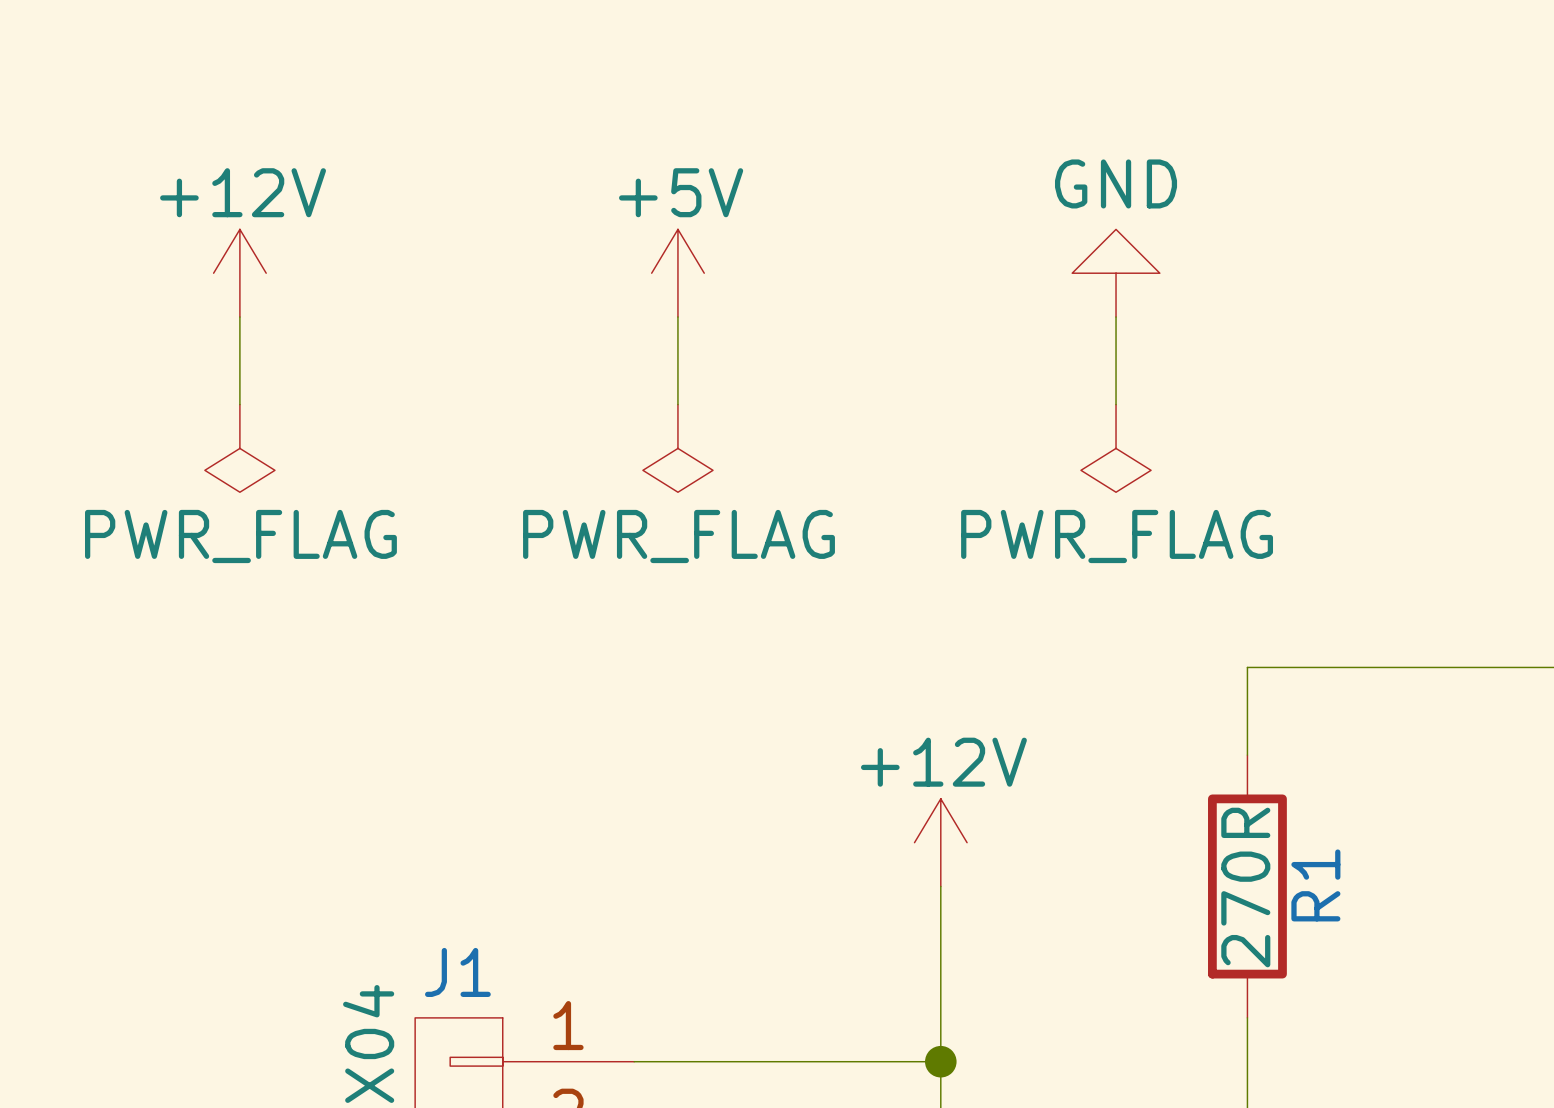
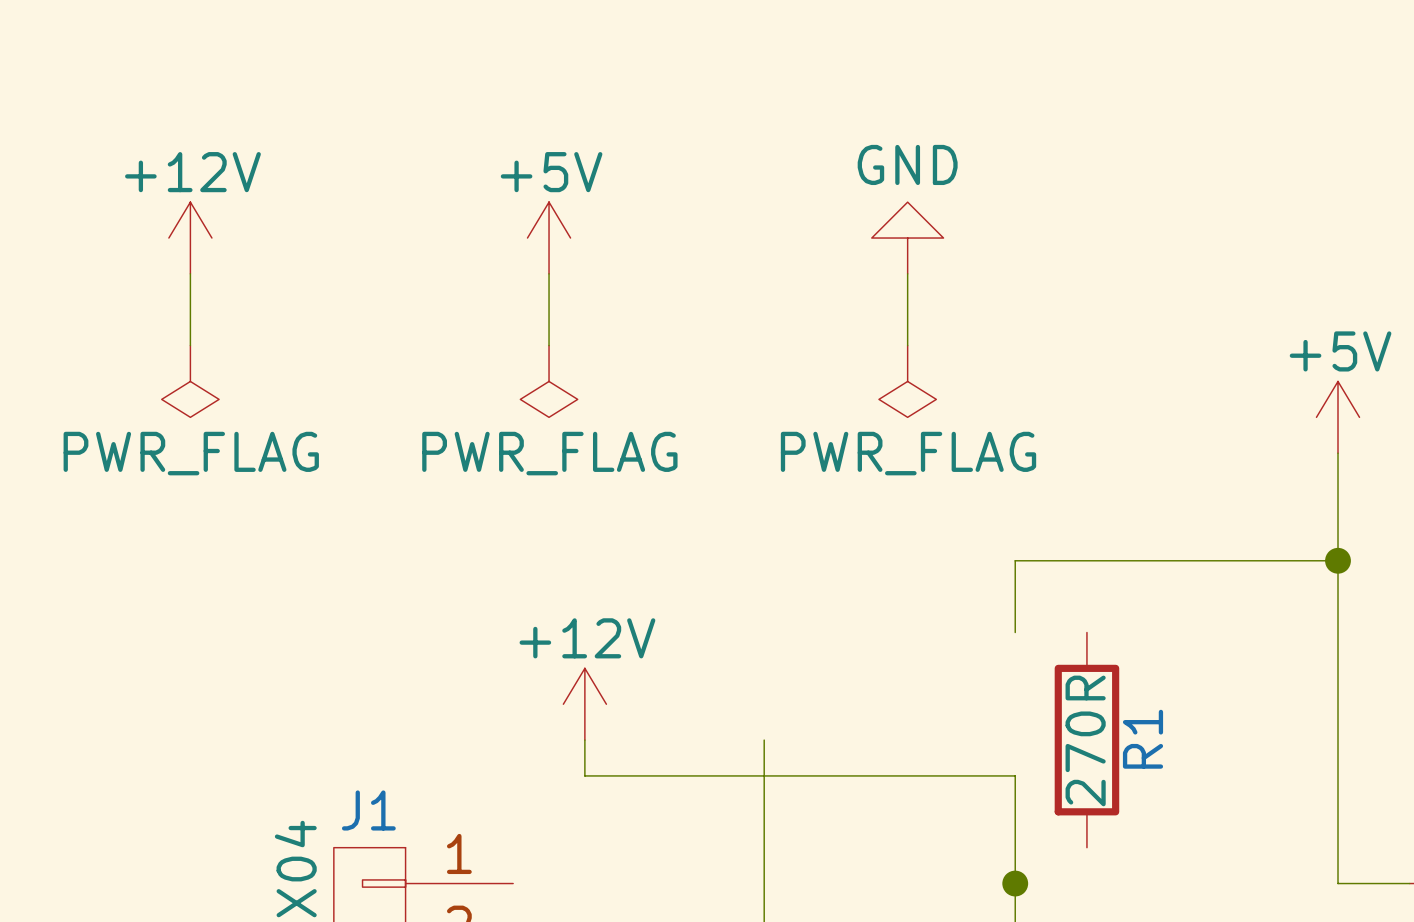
power symbol position: +12V (940, 842) -> +12V (584, 704)
wire: none -> (584, 740) (584, 775) (1015, 775) (1015, 847)
R1 position: (1247, 886) -> (1086, 740)
wire: (634, 1061) (940, 1061) -> none
junction: (940, 1061) -> none
junction: none -> (1015, 883)

